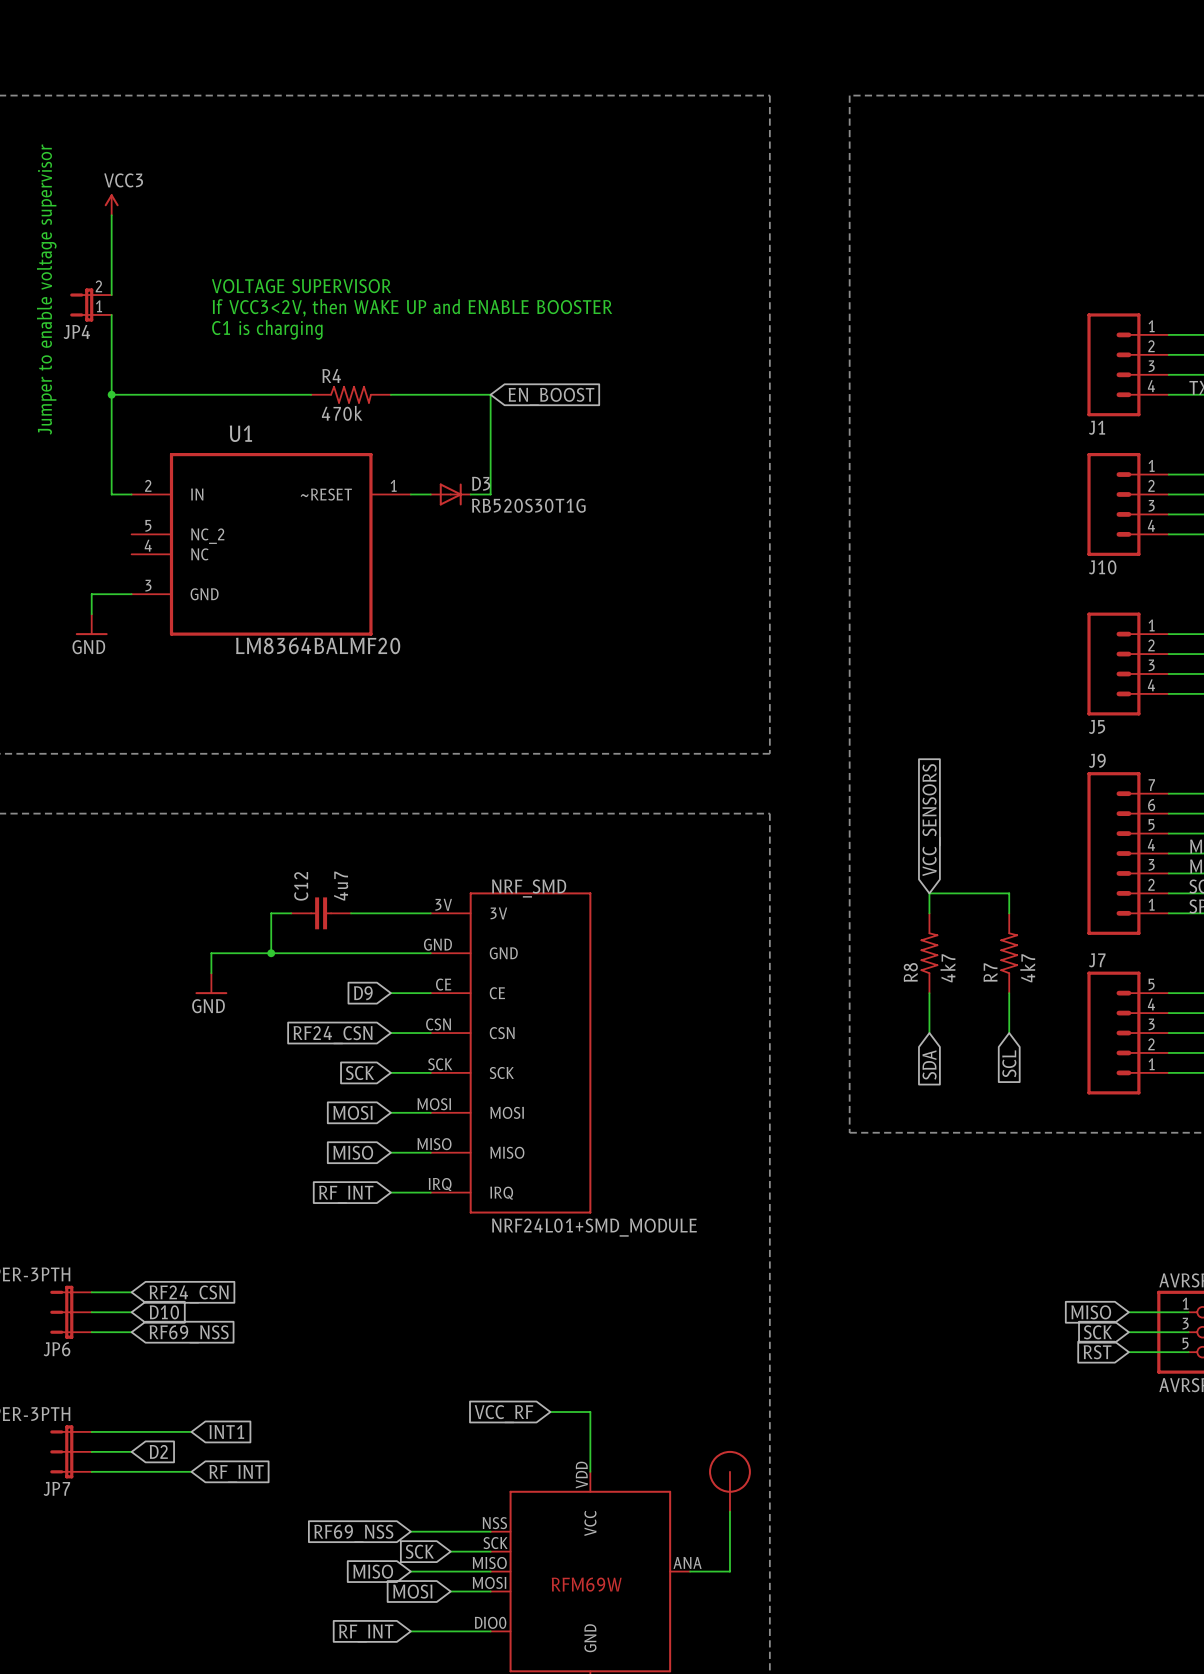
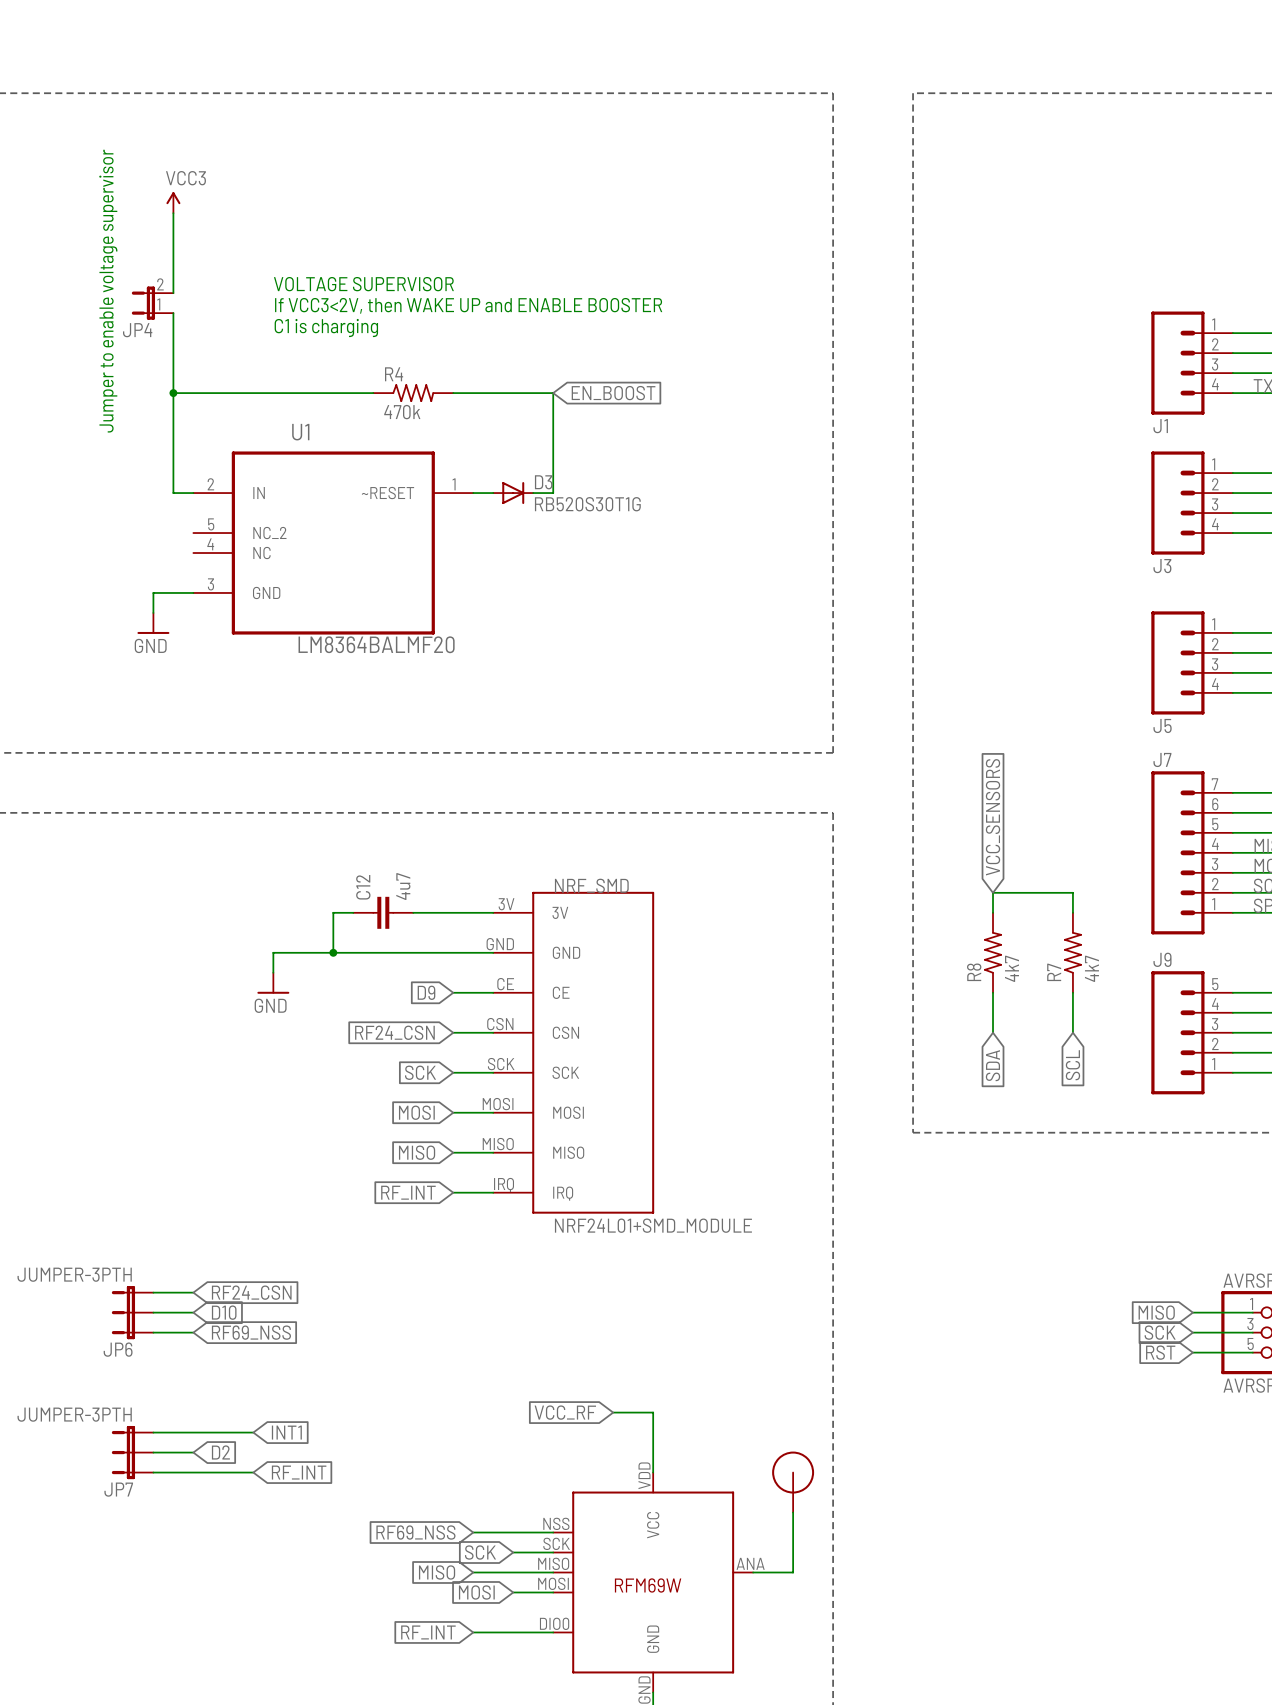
J10 name: J10 (1102, 567) -> J3 (1162, 566)
J9 name: J9 (1097, 760) -> J7 (1162, 759)
J7 name: J7 (1097, 960) -> J9 (1162, 959)

